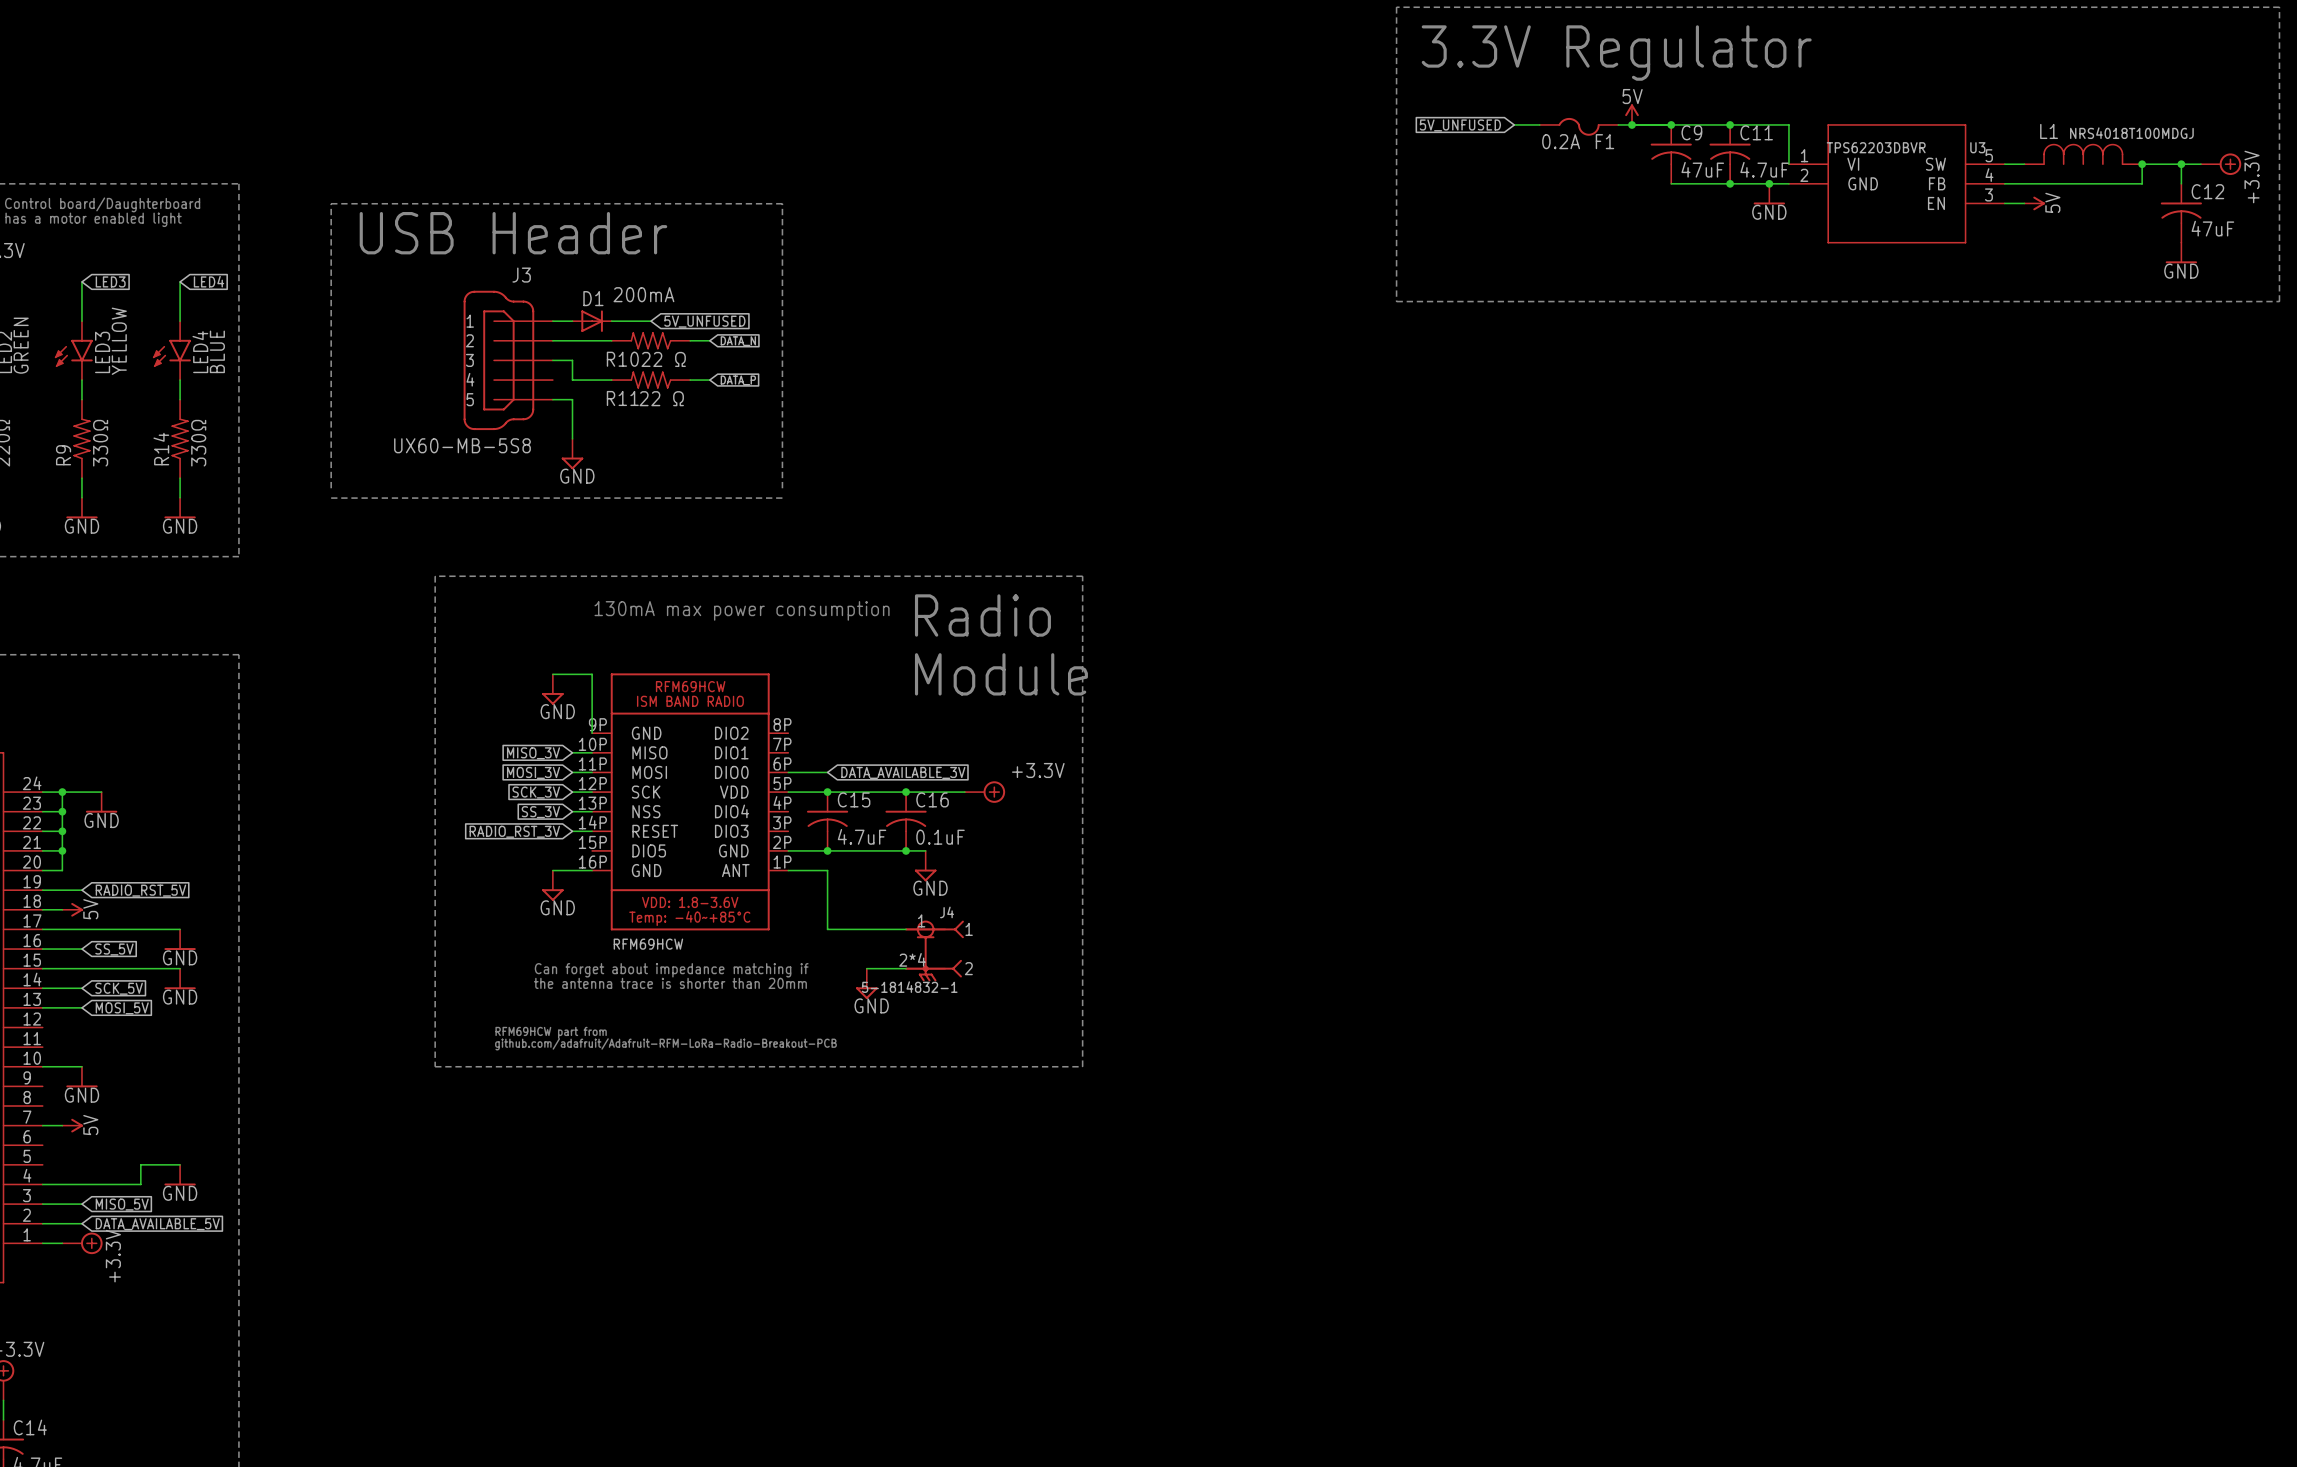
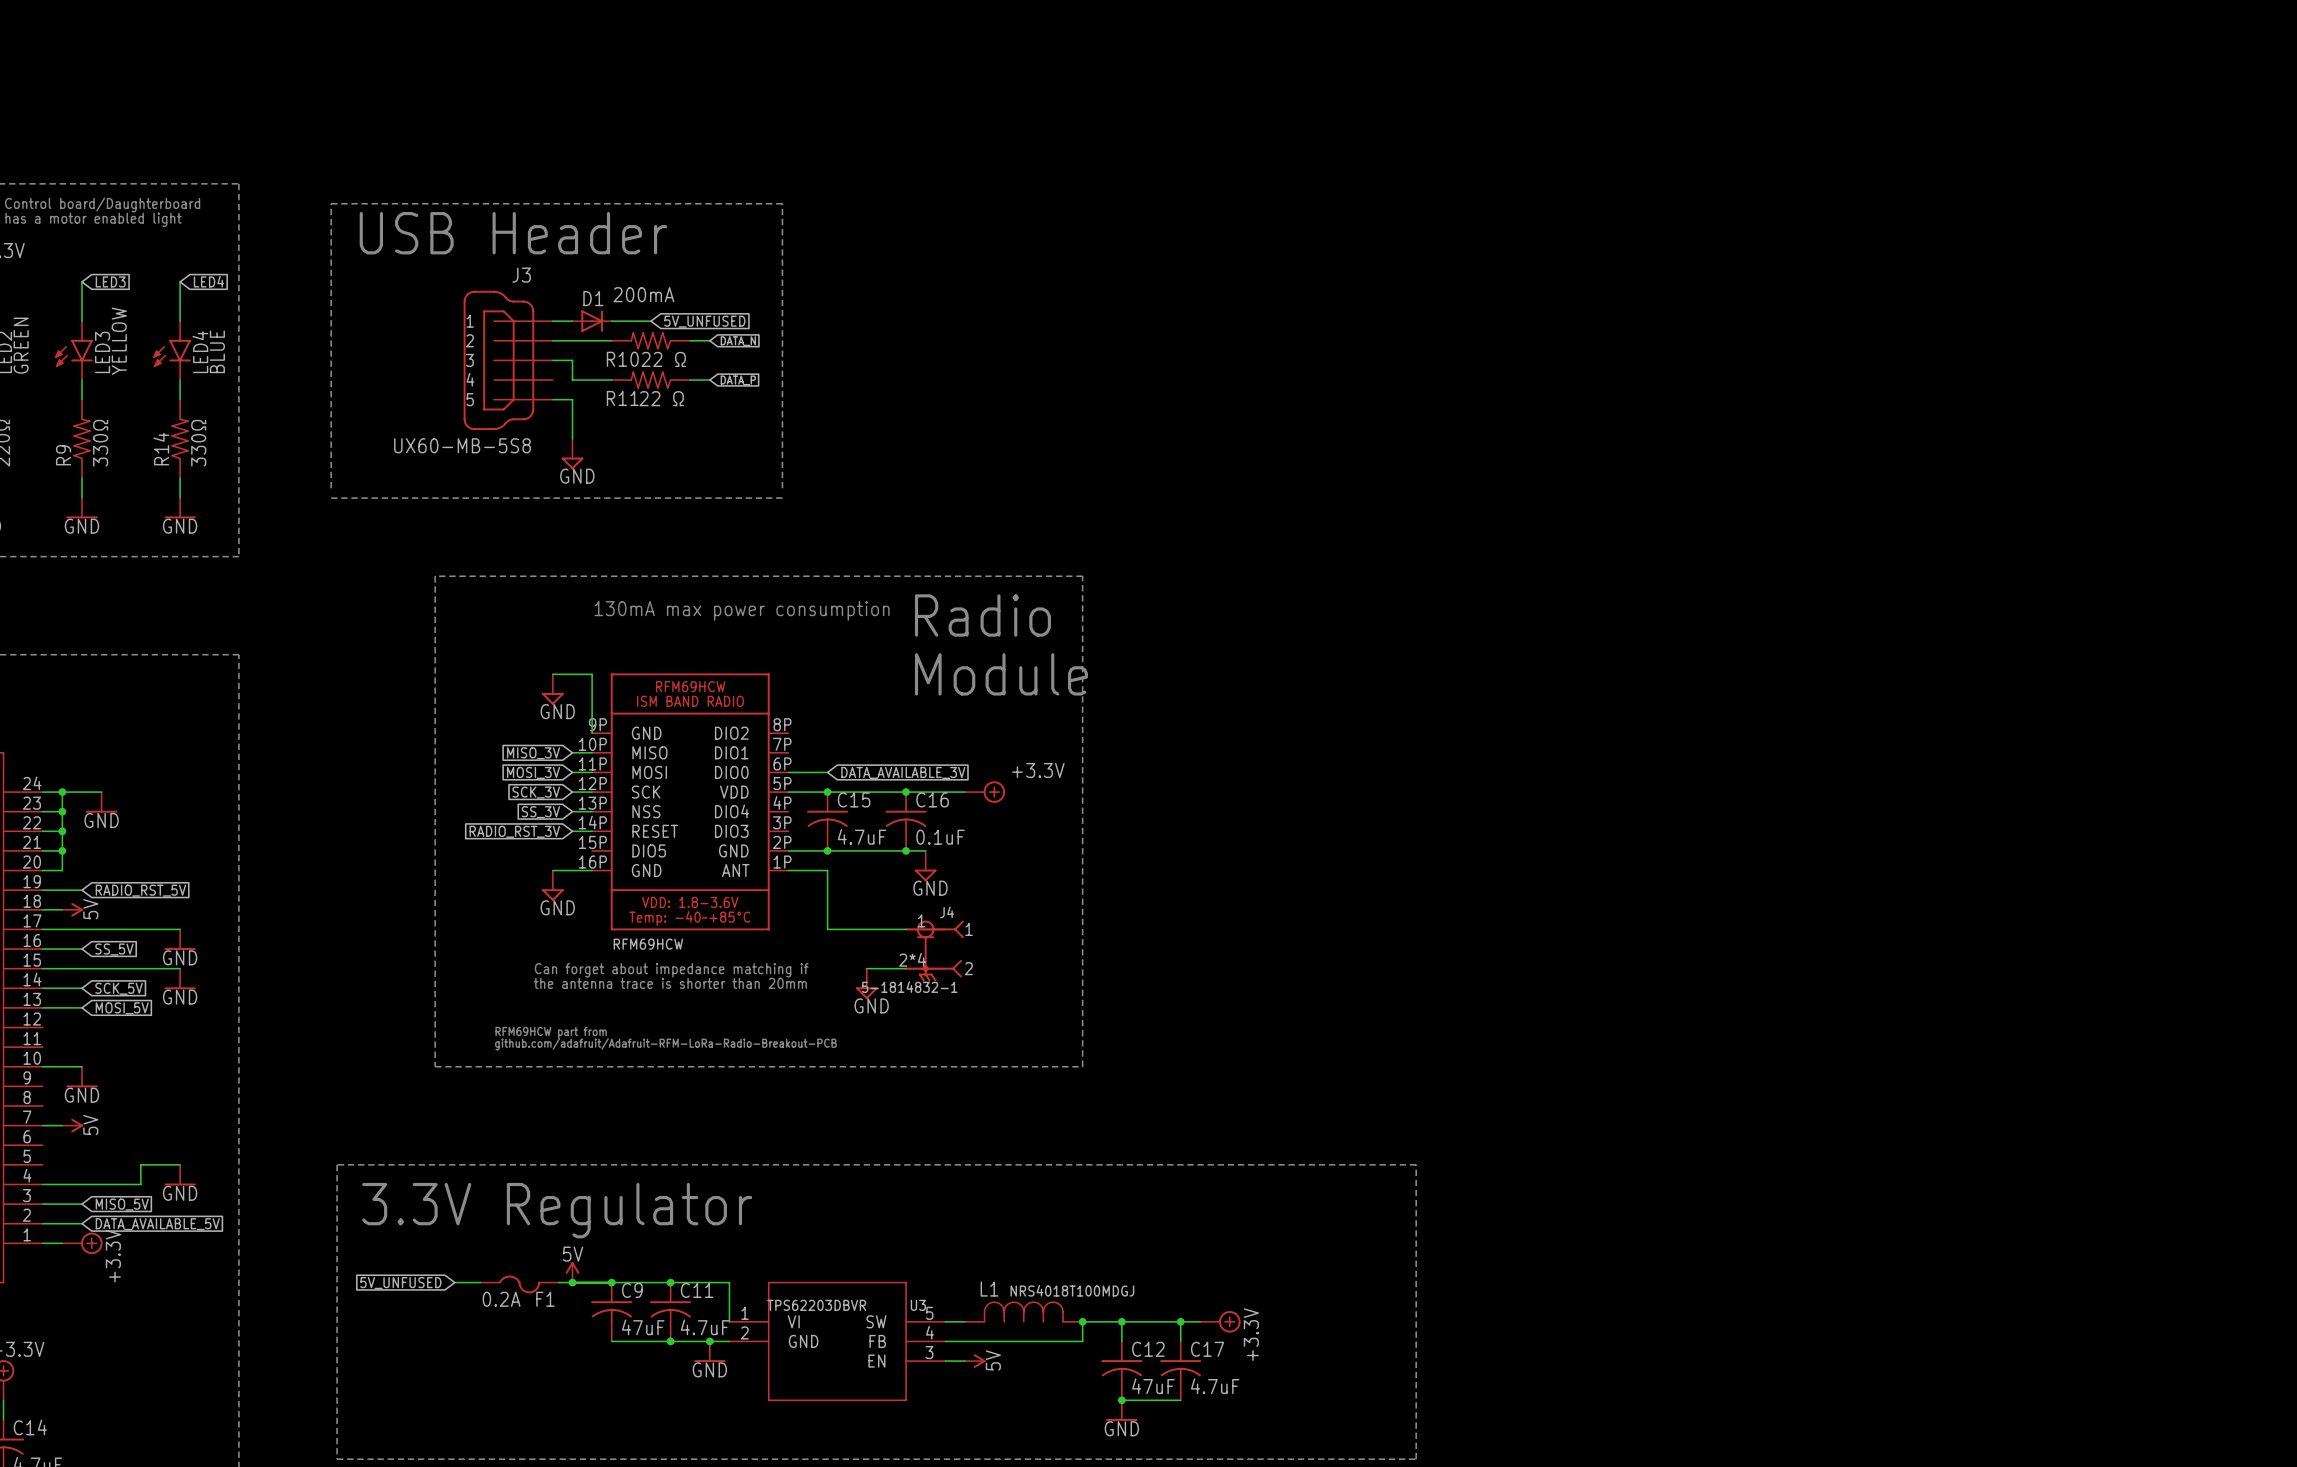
line: (1396, 7) (1396, 301) (2279, 301) (2279, 7) (1396, 7) -> none
text: 3.3V Regulator (1616, 53) -> none
power symbol: 5V (1632, 114) -> none
wire: (1514, 124) (1539, 124) -> none
wire: (1618, 124) (1788, 124) (1788, 164) -> none
junction: (1632, 124) -> none
junction: (1671, 124) -> none
junction: (1730, 124) -> none
global label: 5V_UNFUSED (1460, 125) -> none
F1 position: (1579, 126) -> (519, 1284)
C9 position: (1671, 154) -> (611, 1312)
C11 position: (1730, 154) -> (670, 1312)
L1 position: (2083, 154) -> (1023, 1312)
wire: (2004, 164) (2024, 164) -> none
junction: (2142, 164) -> none
wire: (2181, 164) (2181, 183) -> none
junction: (2181, 164) -> none
wire: (2201, 164) (2142, 164) (2142, 183) (2004, 183) -> none
power symbol: +3.3V (2221, 164) -> none
wire: (1671, 183) (1788, 183) -> none
junction: (1730, 183) -> none
junction: (1769, 183) -> none
U3 position: (1896, 183) -> (837, 1341)
power symbol: GND (1769, 194) -> none
wire: (2004, 203) (2024, 203) -> none
power symbol: 5V (2034, 203) -> none
C12 position: (2181, 213) -> (1121, 1370)
power symbol: GND (2181, 253) -> none
line: none -> (337, 1164) (337, 1459) (1416, 1459) (1416, 1164) (337, 1164)
text: none -> 3.3V Regulator (557, 1210)
power symbol: none -> 5V (572, 1272)
wire: none -> (454, 1282) (480, 1282)
wire: none -> (558, 1282) (729, 1282) (729, 1321)
junction: none -> (572, 1282)
junction: none -> (611, 1282)
junction: none -> (670, 1282)
global label: none -> 5V_UNFUSED (400, 1283)
wire: none -> (945, 1321) (964, 1321)
junction: none -> (1082, 1321)
wire: none -> (1121, 1321) (1121, 1341)
junction: none -> (1121, 1321)
wire: none -> (1180, 1321) (1180, 1341)
junction: none -> (1180, 1321)
wire: none -> (1200, 1321) (1082, 1321) (1082, 1341) (945, 1341)
power symbol: none -> +3.3V (1220, 1321)
wire: none -> (611, 1341) (729, 1341)
junction: none -> (670, 1341)
junction: none -> (709, 1341)
power symbol: none -> GND (709, 1351)
wire: none -> (945, 1361) (964, 1361)
power symbol: none -> 5V (975, 1361)
C17: none -> 4.7uF (1180, 1370)
wire: none -> (1121, 1400) (1180, 1400)
junction: none -> (1121, 1400)
power symbol: none -> GND (1121, 1410)

